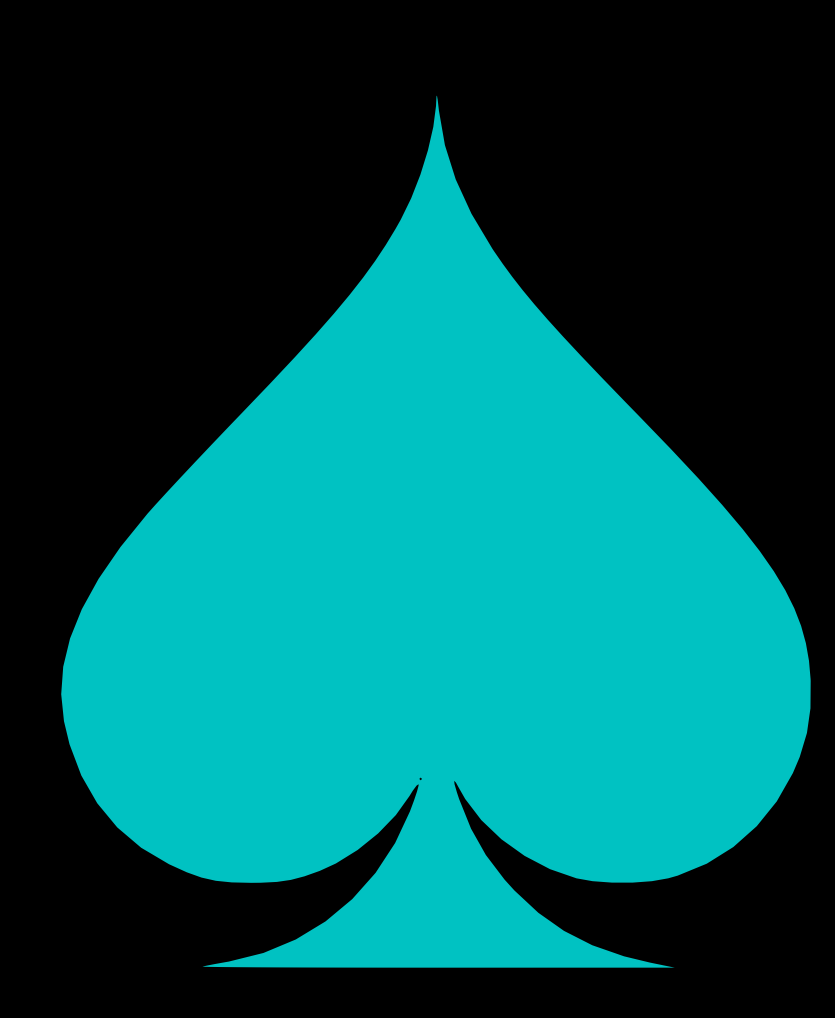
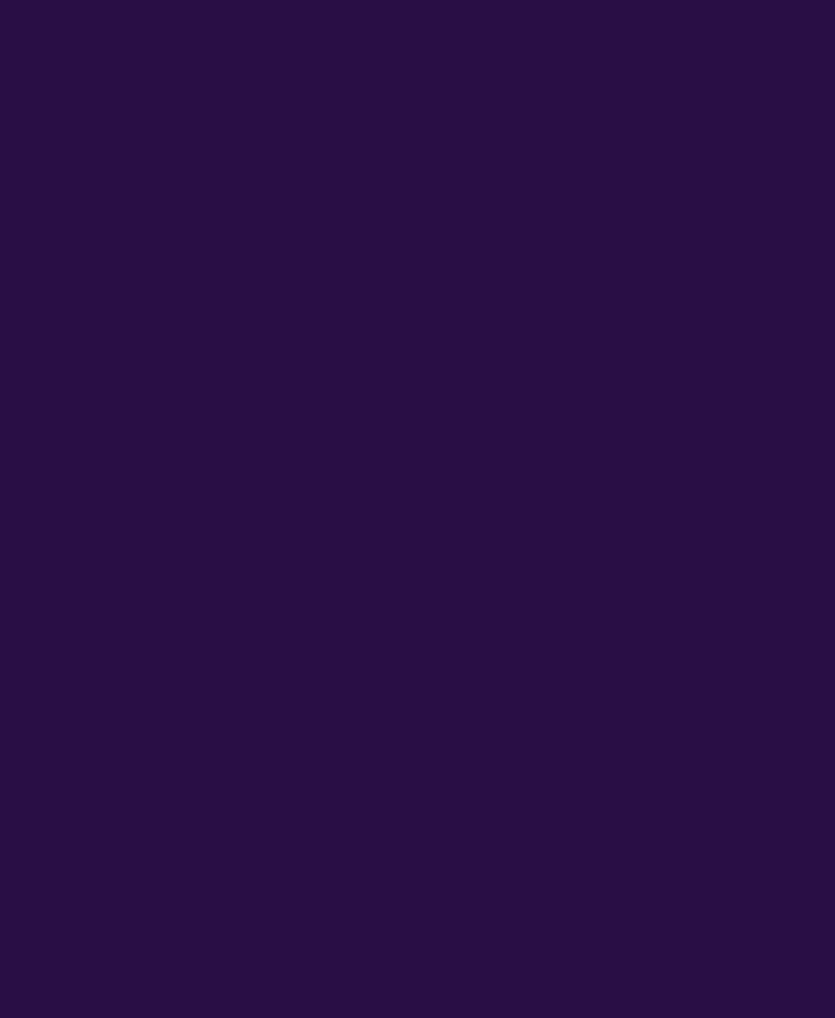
part: (435, 531) -> none

